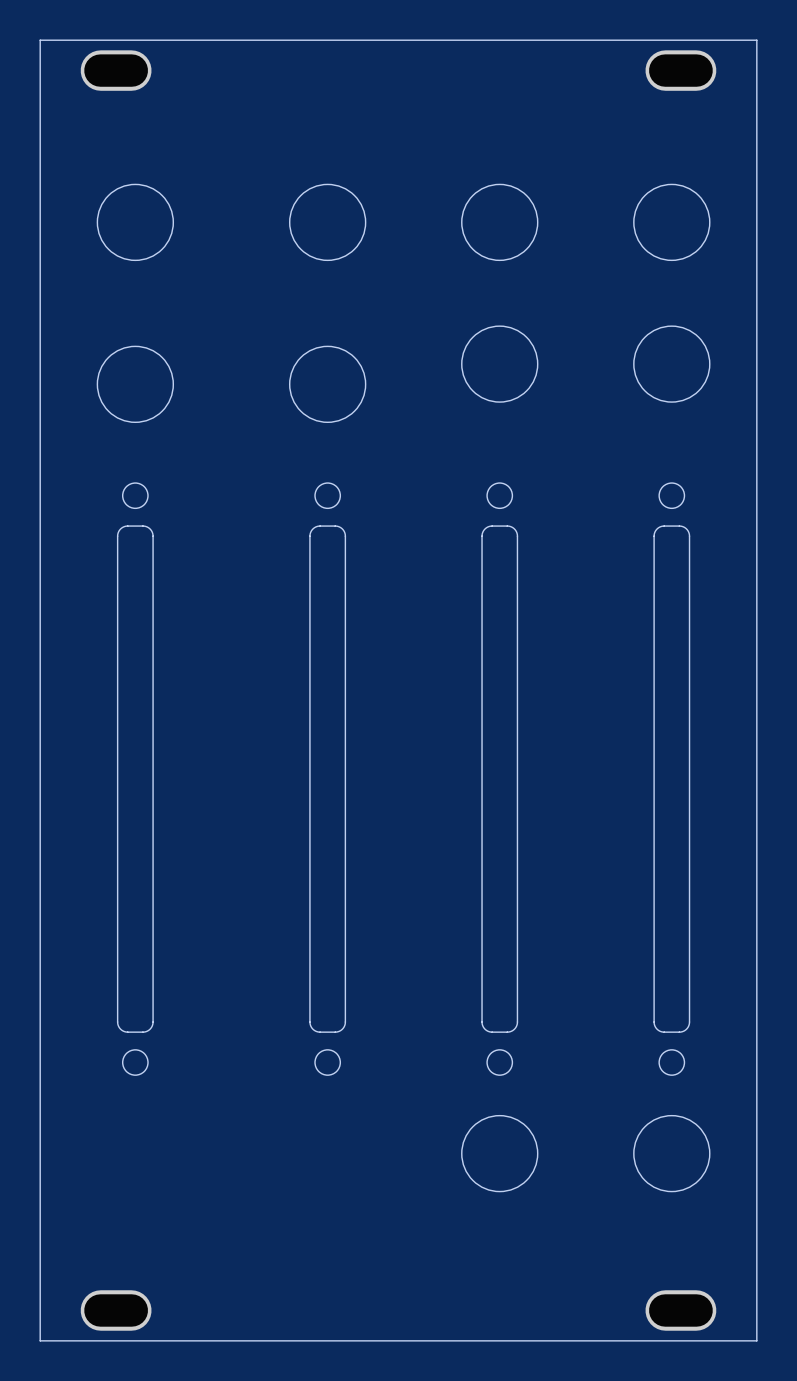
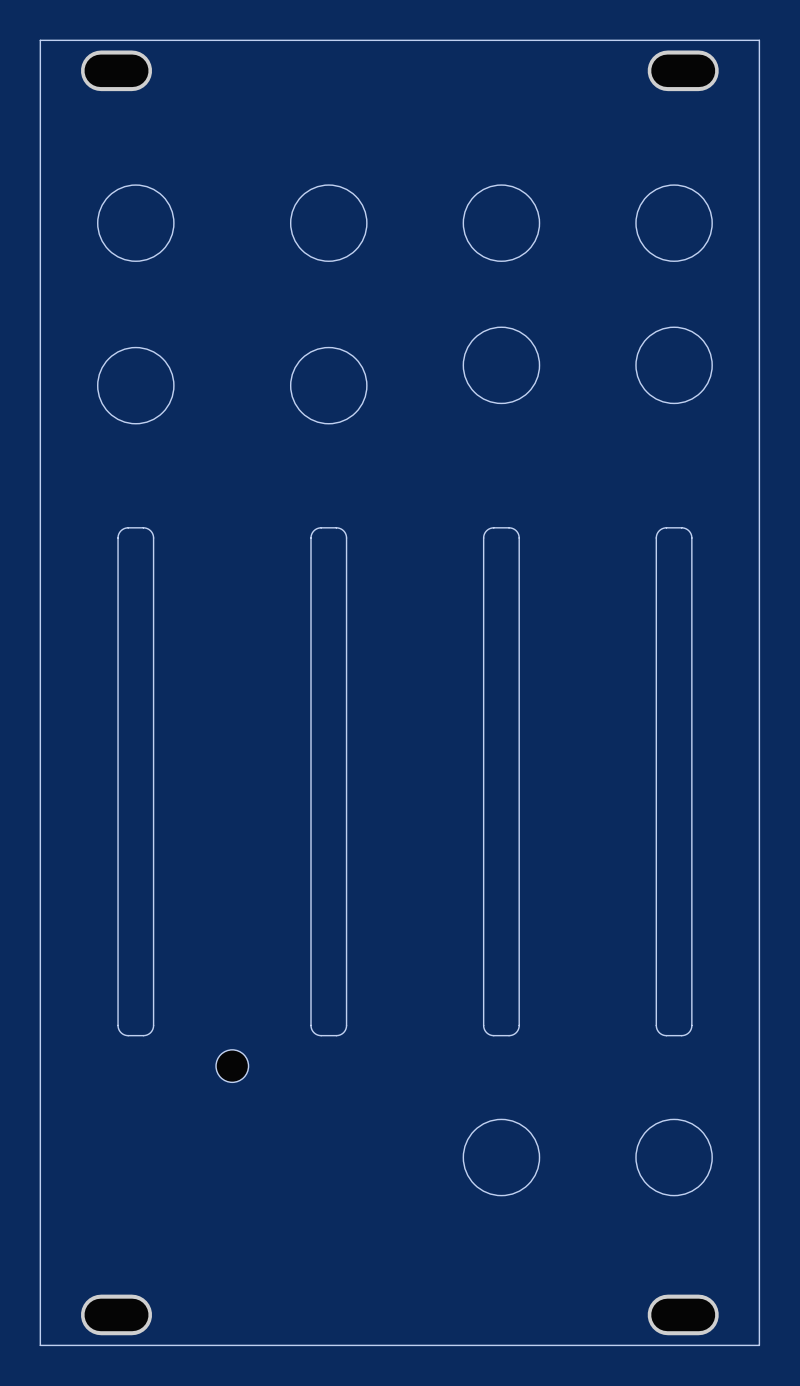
round board edge: [122, 482, 149, 509] -> none
round board edge: [314, 482, 341, 509] -> none
round board edge: [486, 482, 513, 509] -> none
round board edge: [658, 482, 685, 509] -> none
round board edge: [122, 1049, 149, 1076] -> none
round board edge: [314, 1049, 341, 1076] -> none
round board edge: [486, 1049, 513, 1076] -> none
round board edge: [658, 1049, 685, 1076] -> none
part: none -> (232, 1066)

